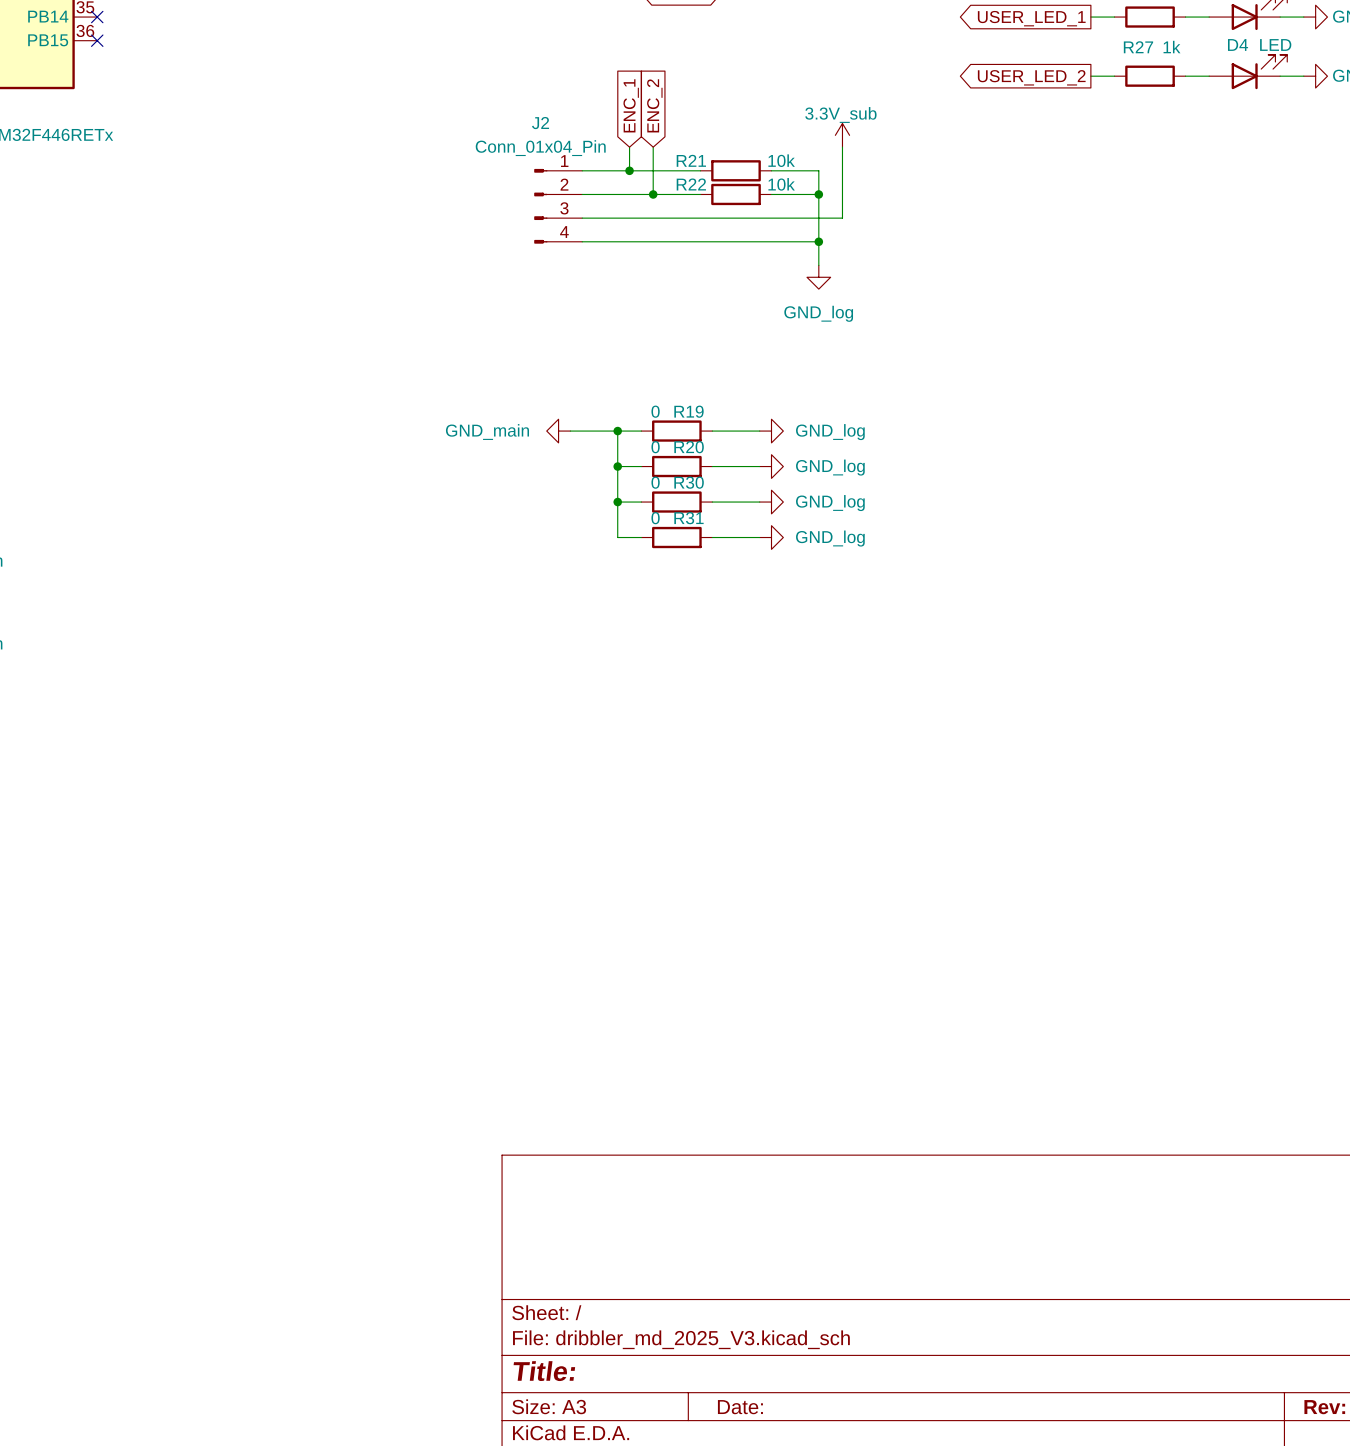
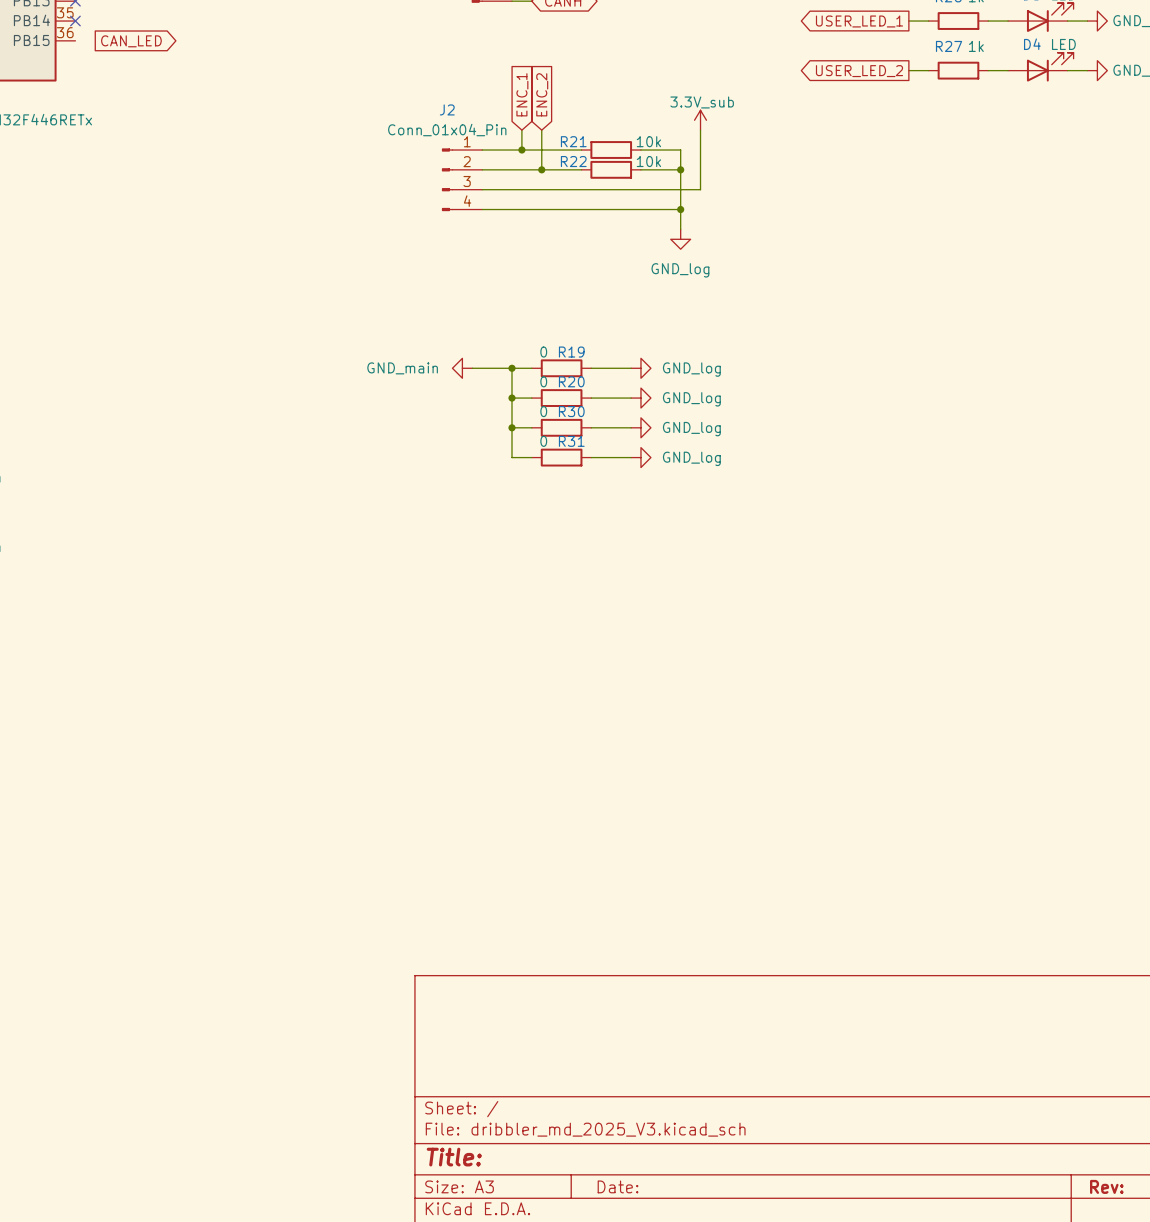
no-connect mark: (97, 40) -> none
global label: none -> CAN_LED (131, 41)

